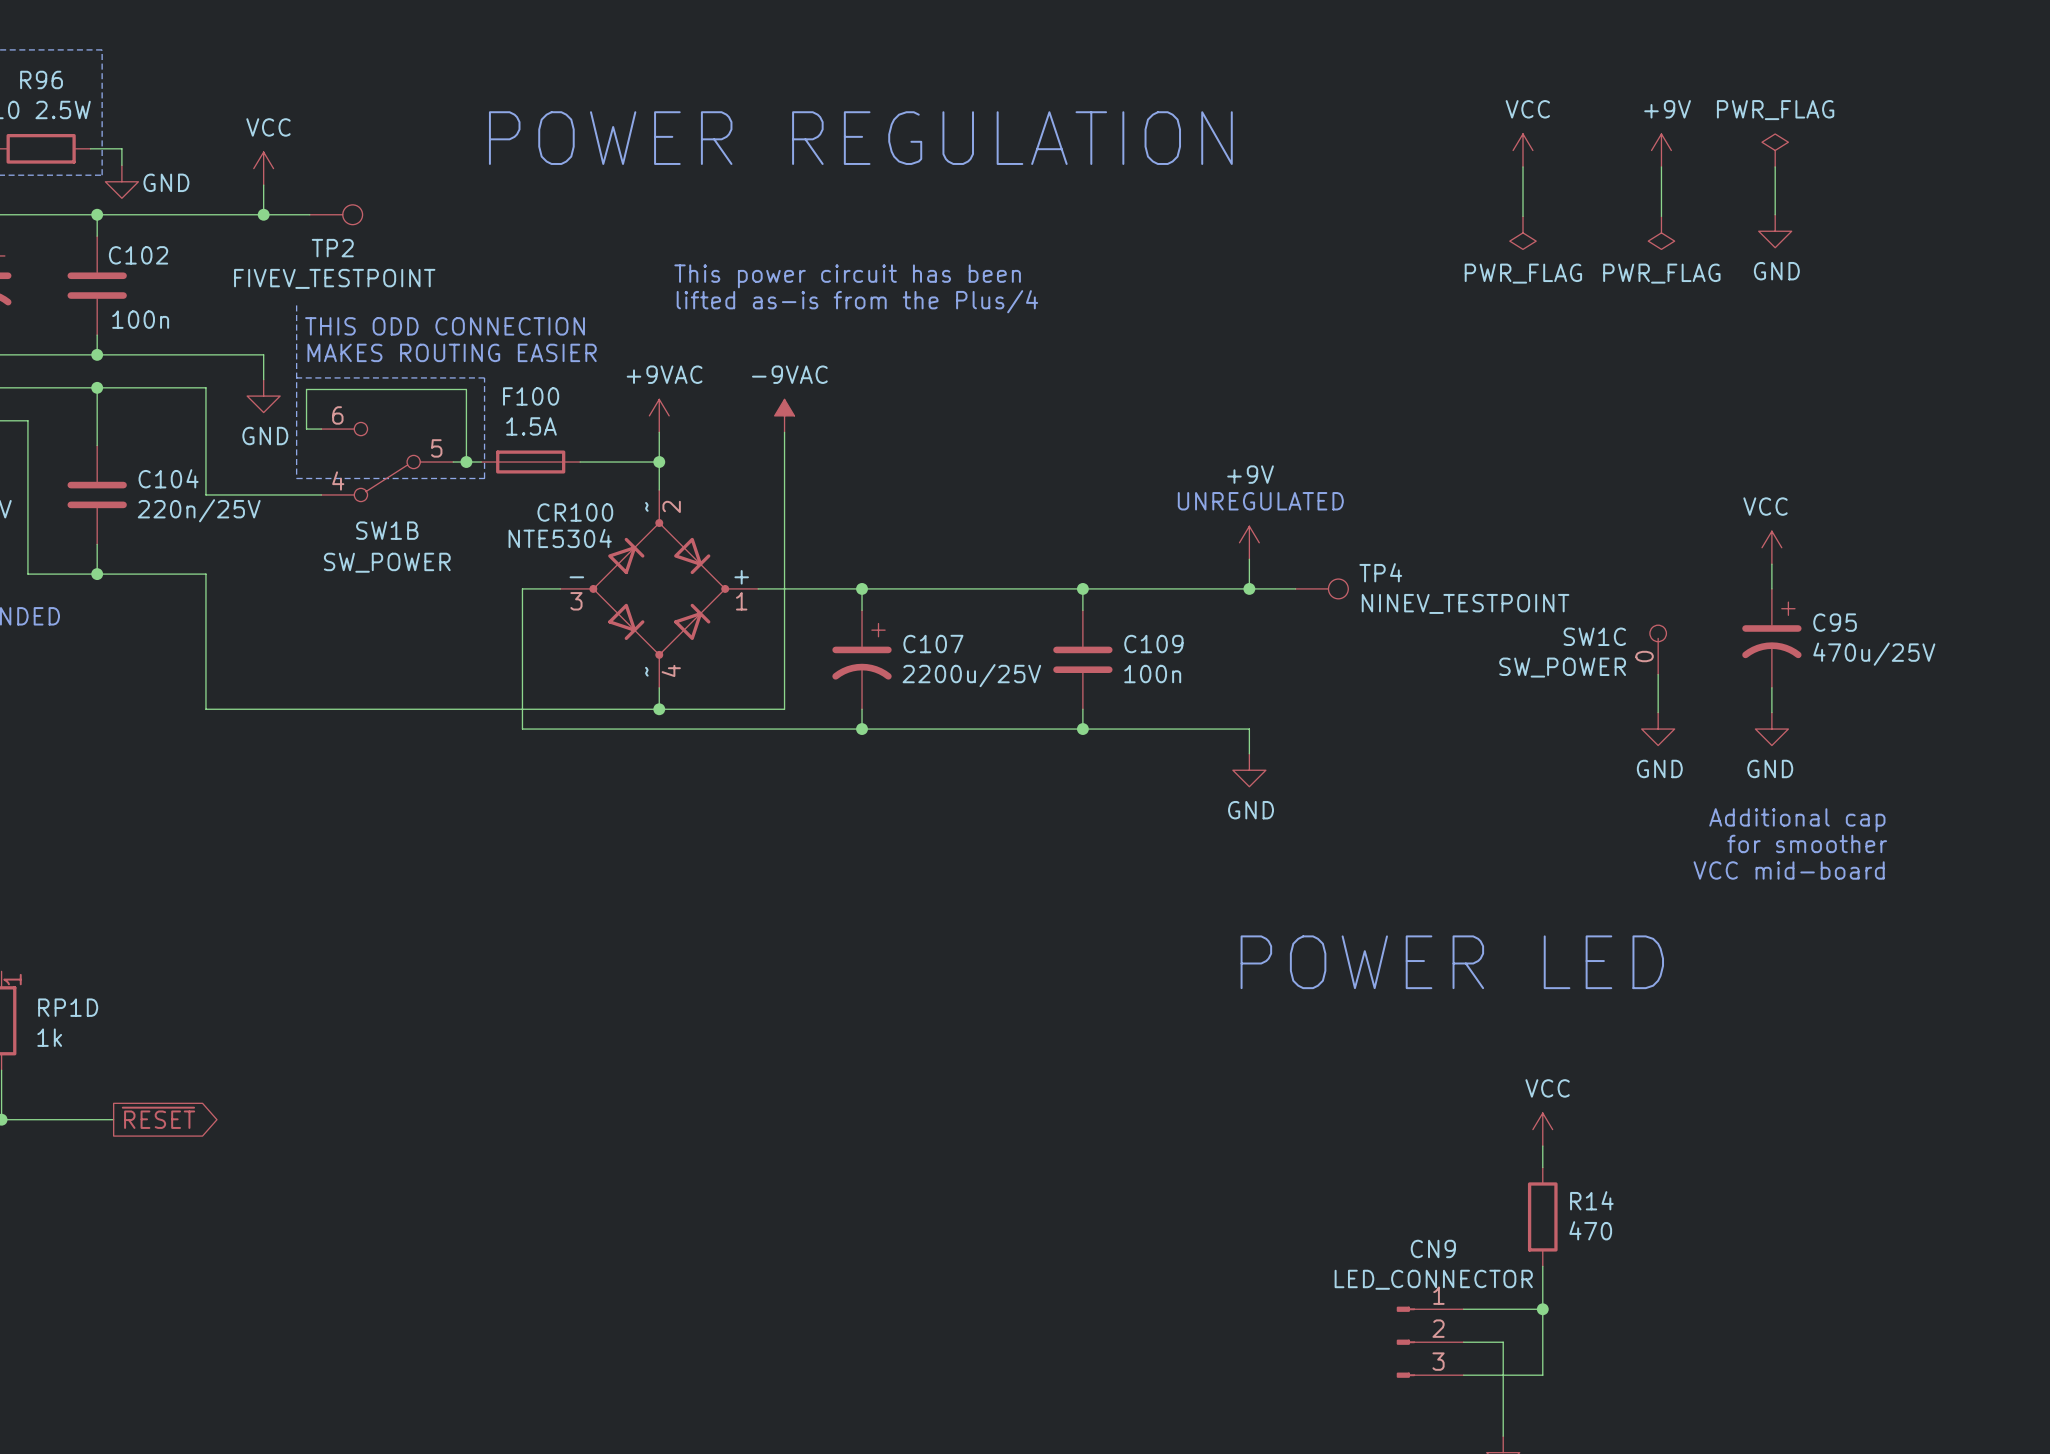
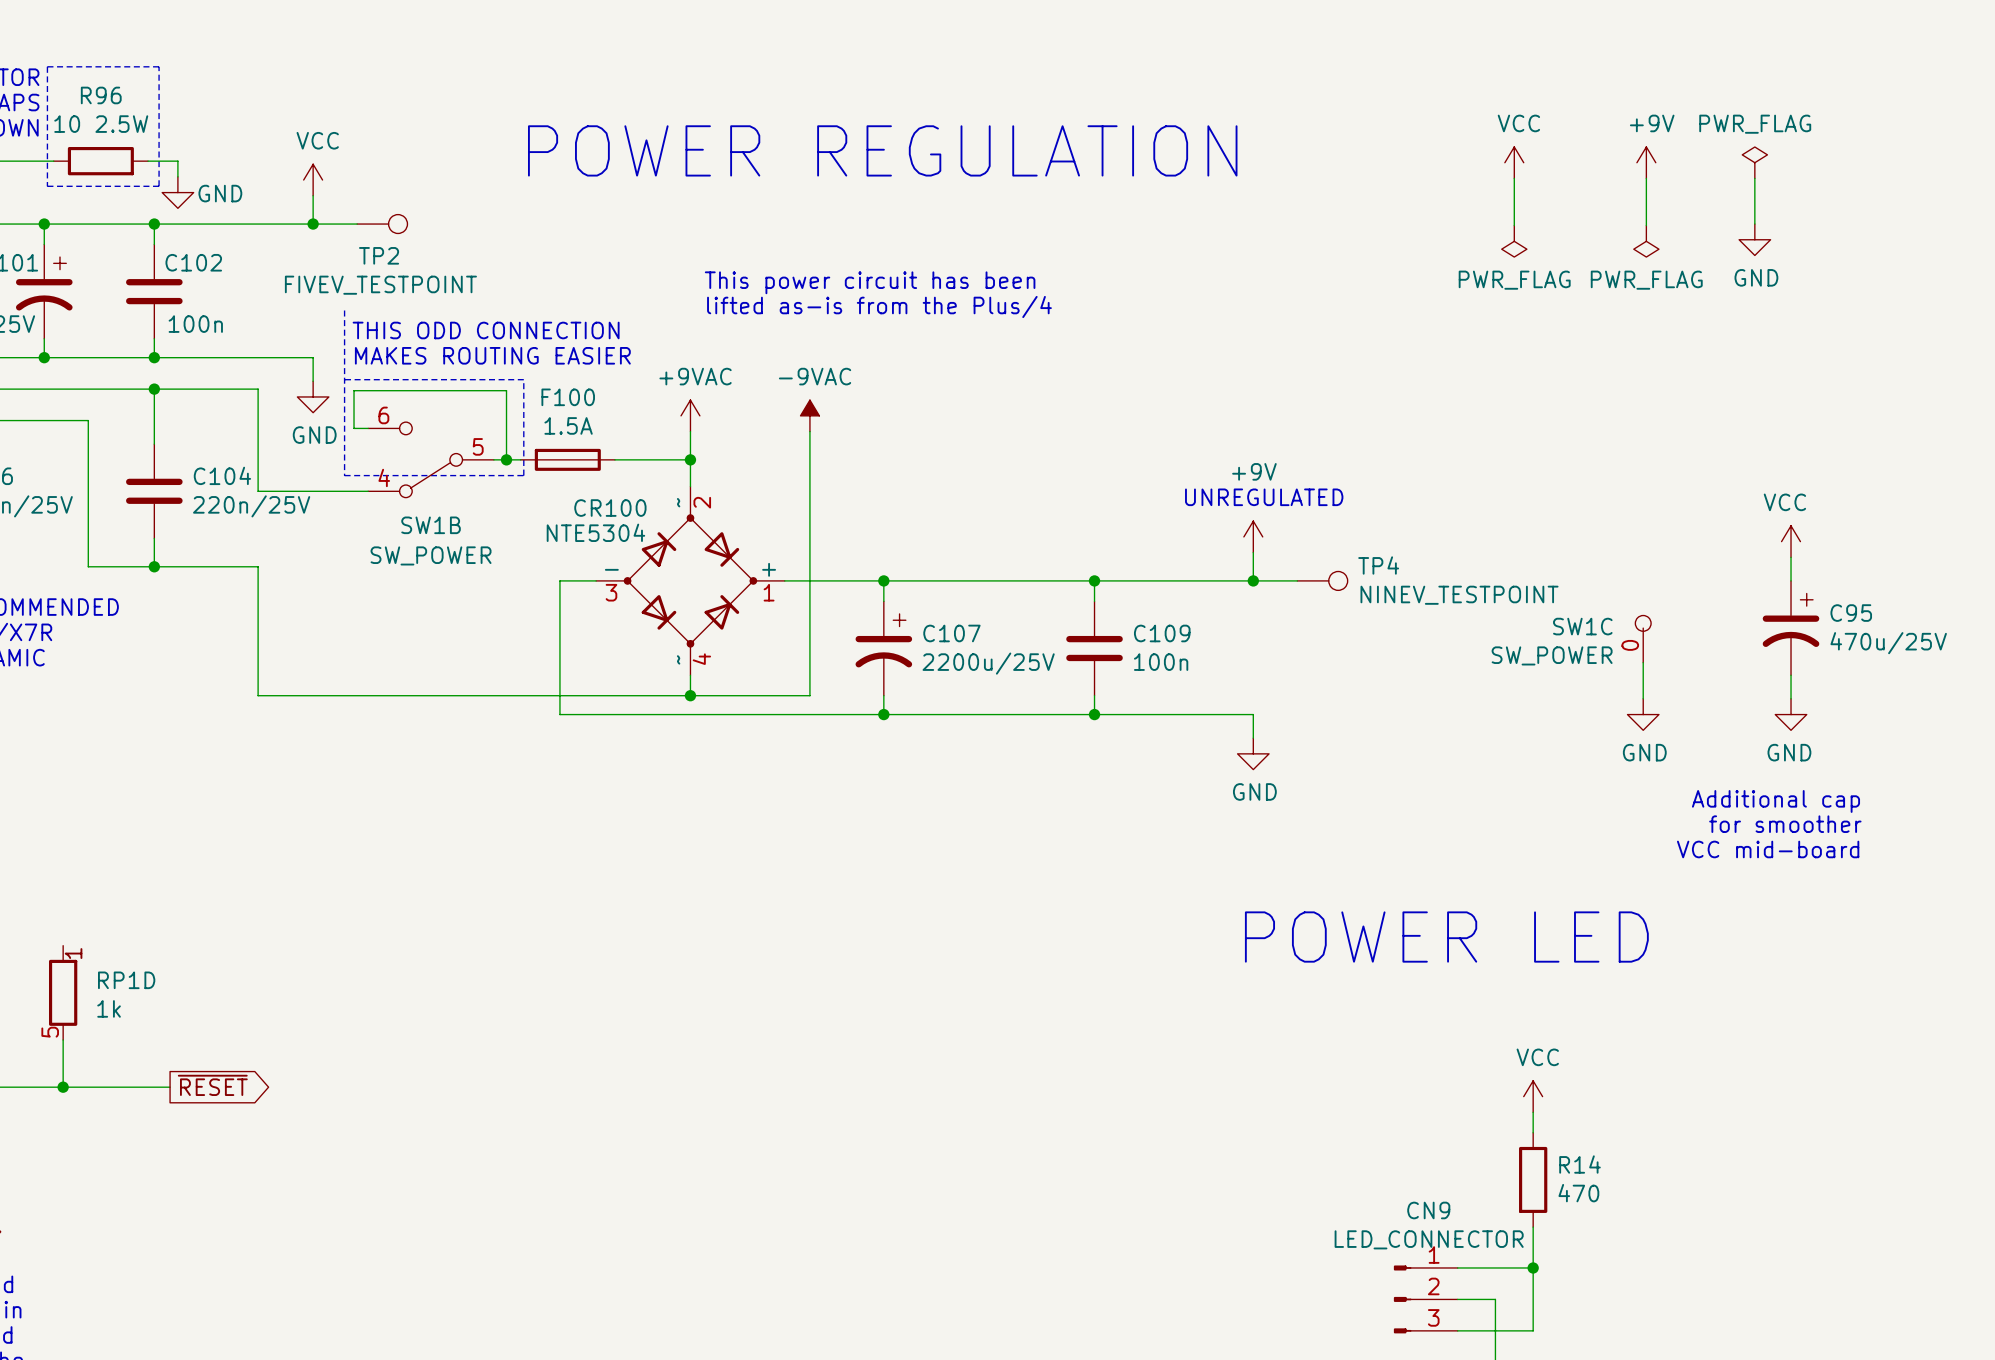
power symbol position: VCC (1771, 547) -> VCC (1791, 541)
wire: (1771, 564) (1771, 588) -> (1791, 557) (1791, 580)
C95 position: (1771, 638) -> (1791, 628)
wire: (1771, 687) (1771, 712) -> (1791, 675) (1791, 698)
power symbol position: GND (1771, 729) -> GND (1791, 714)

